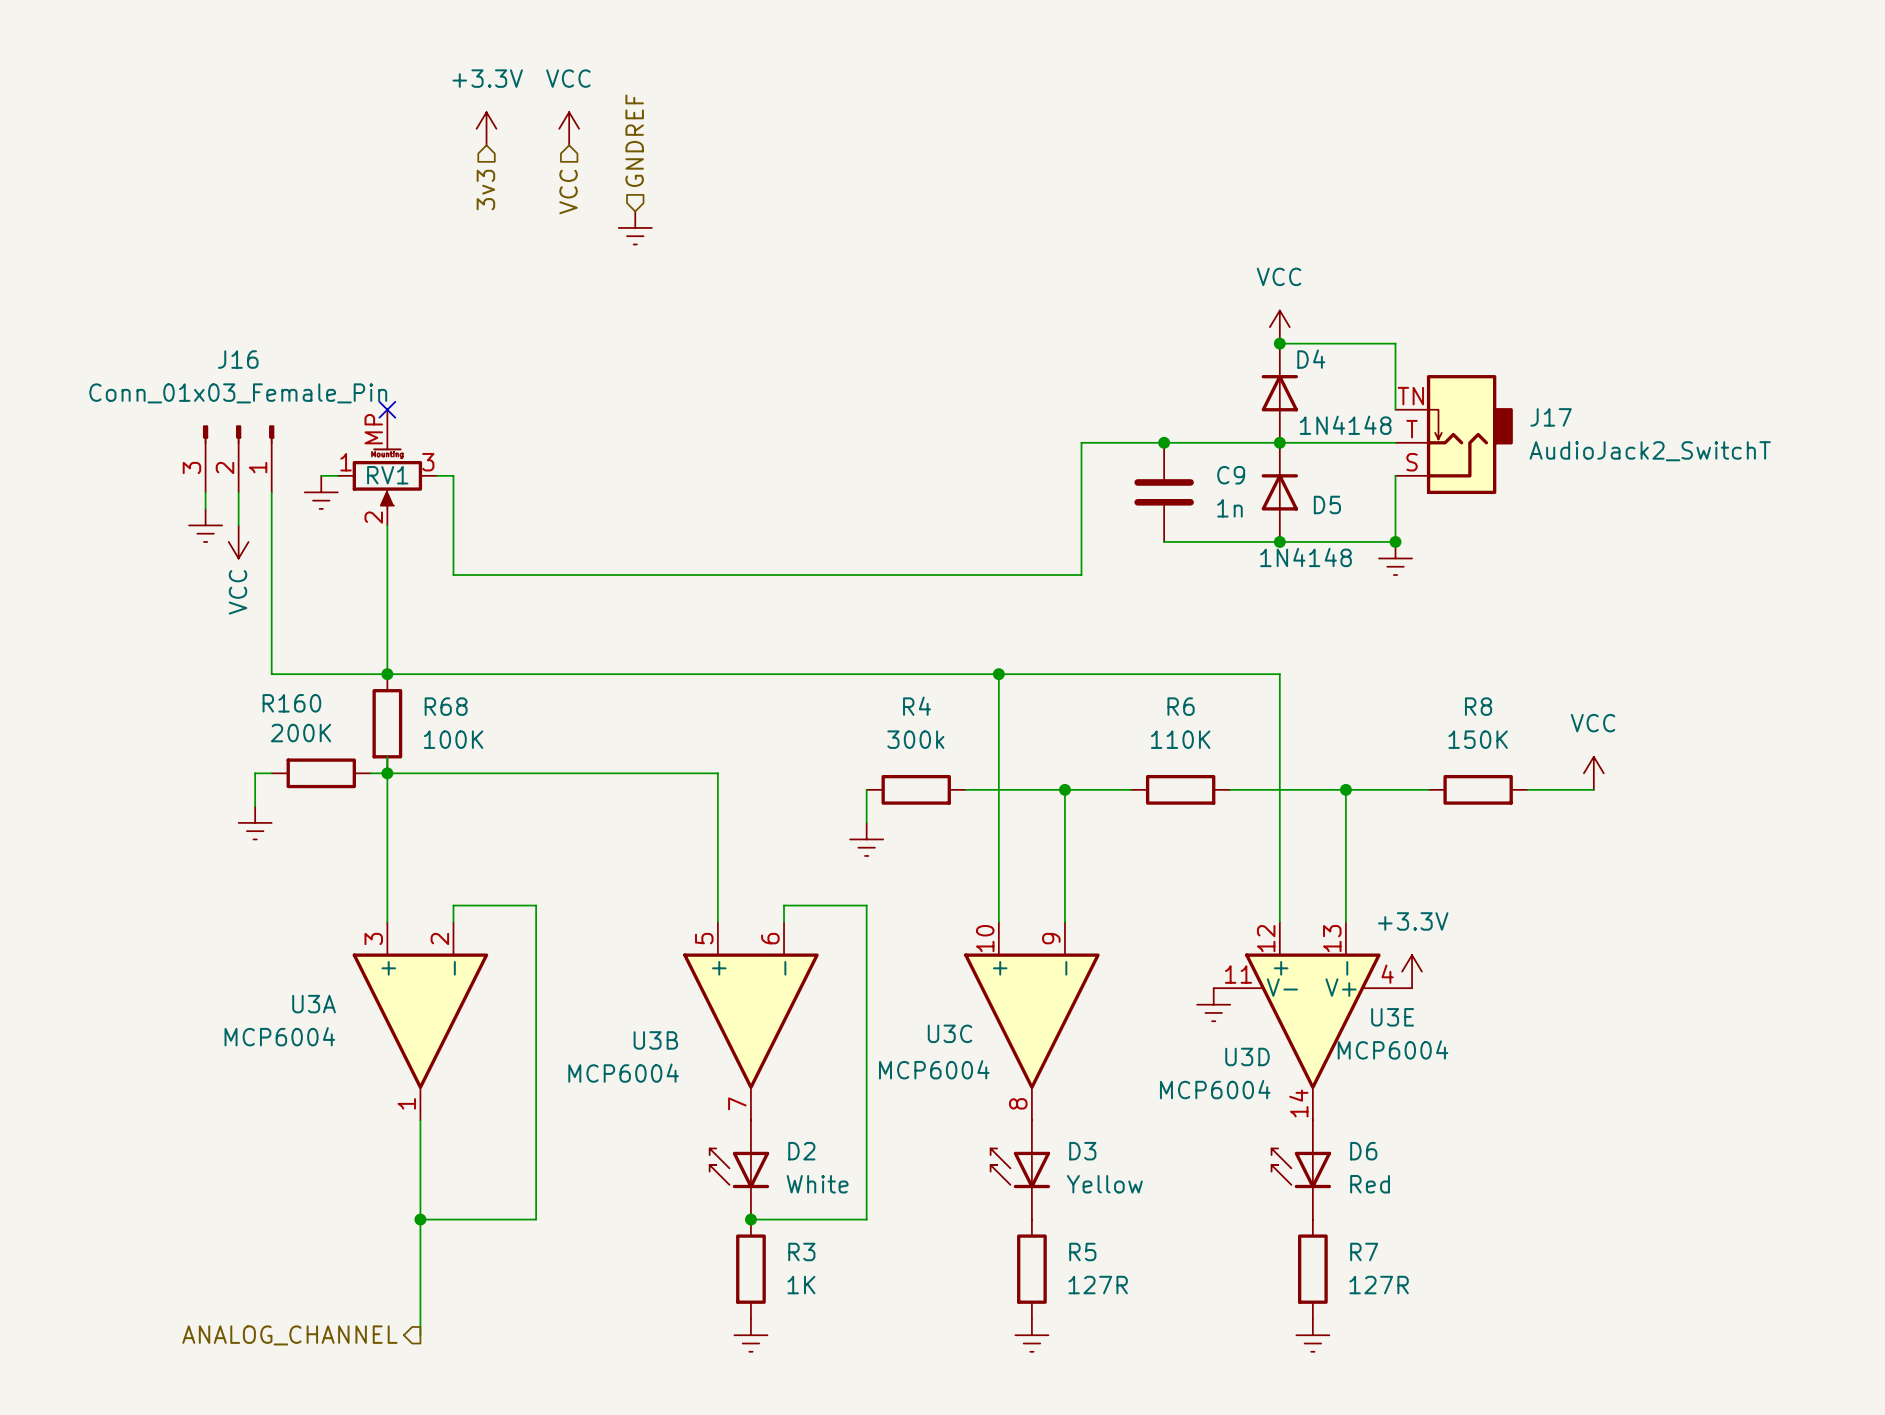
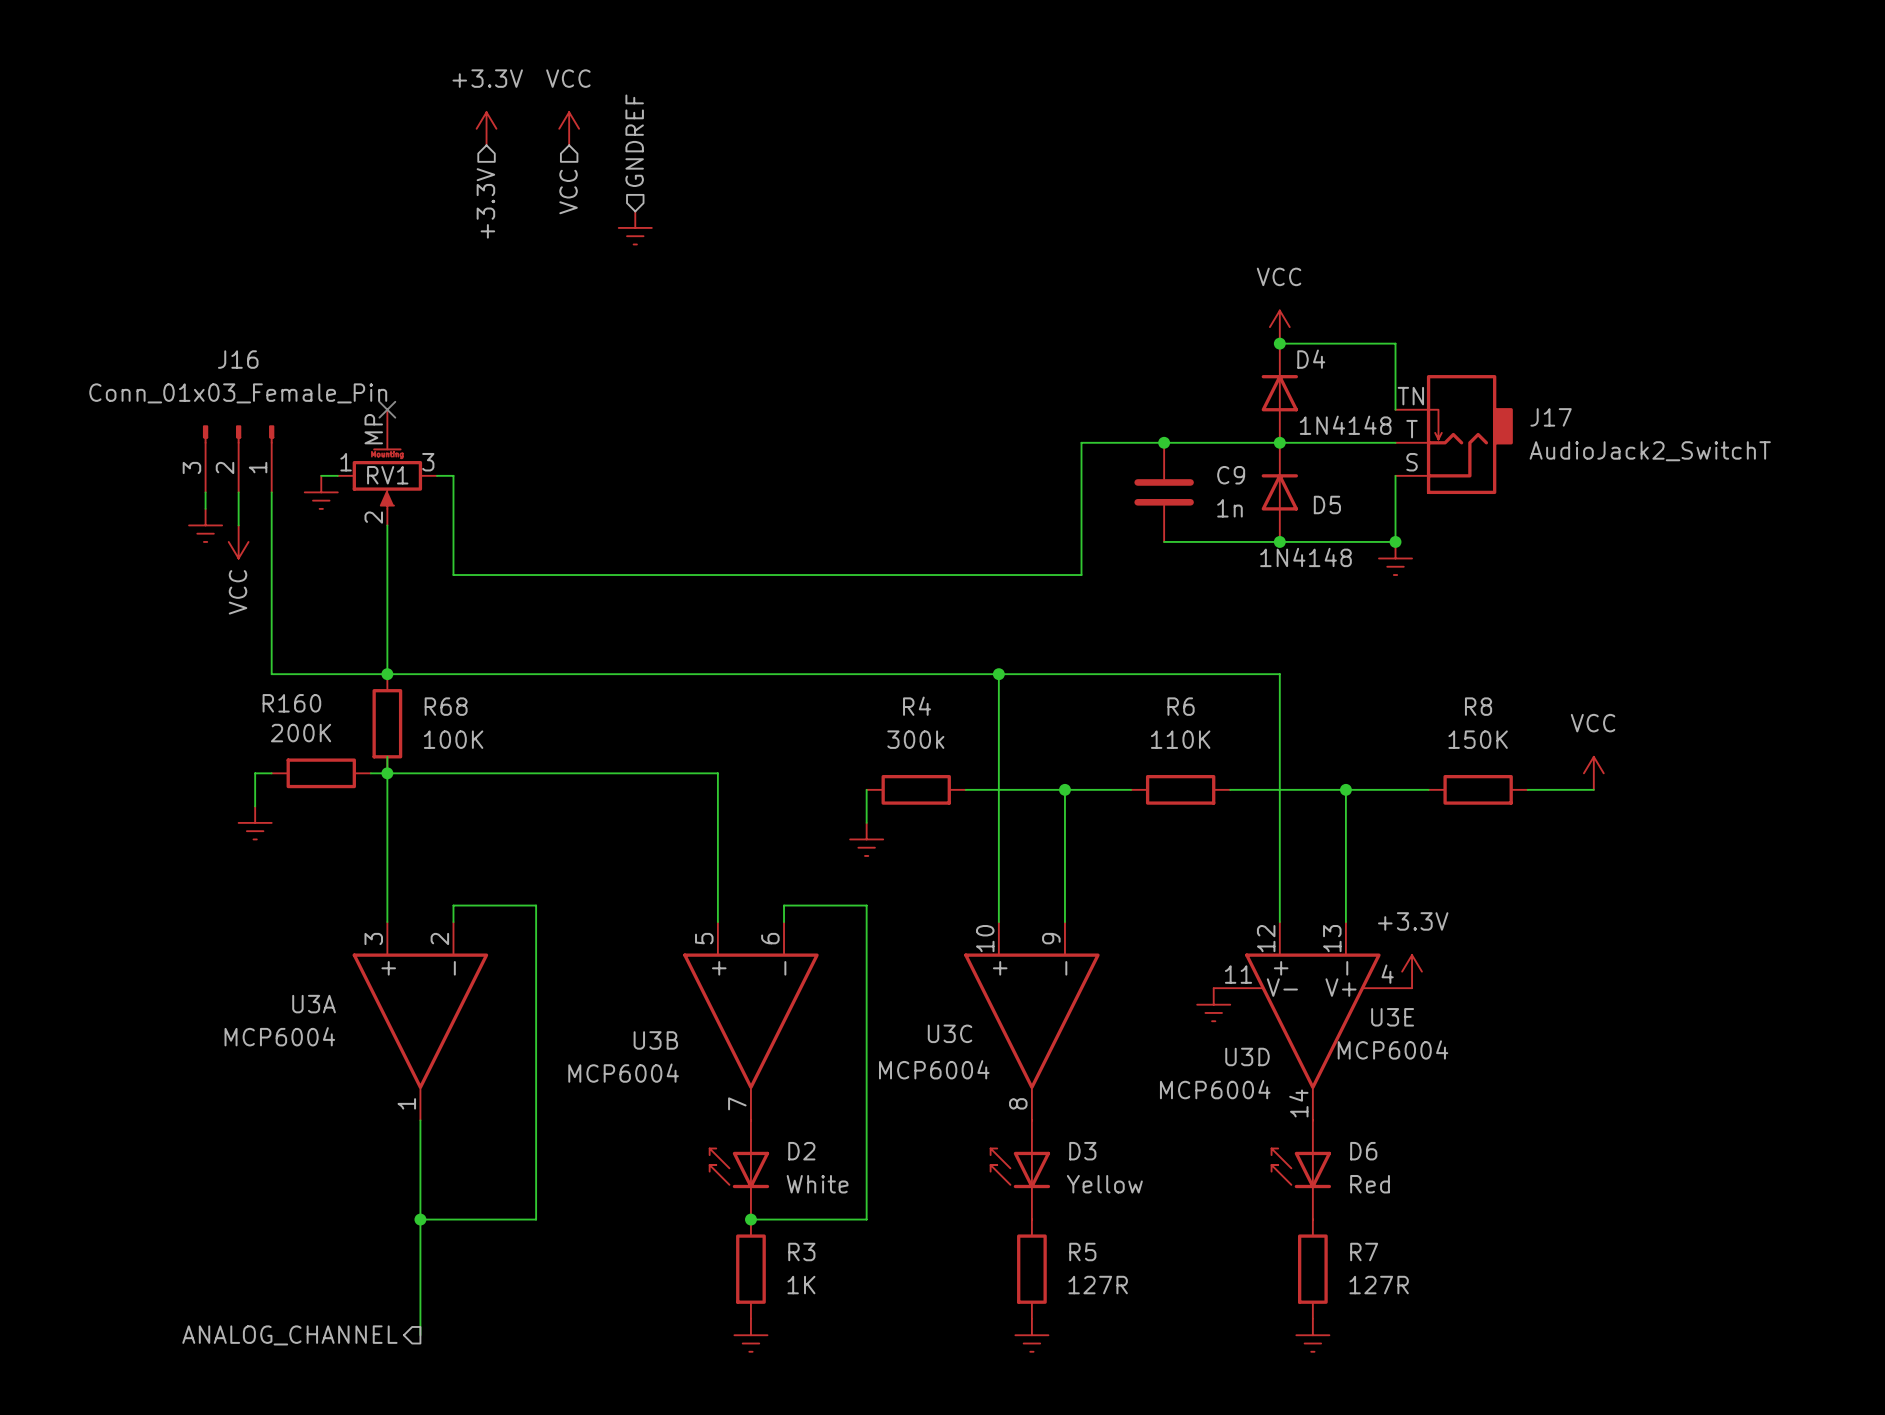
hierarchical label: 3v3 (485, 190) -> +3.3V (485, 203)

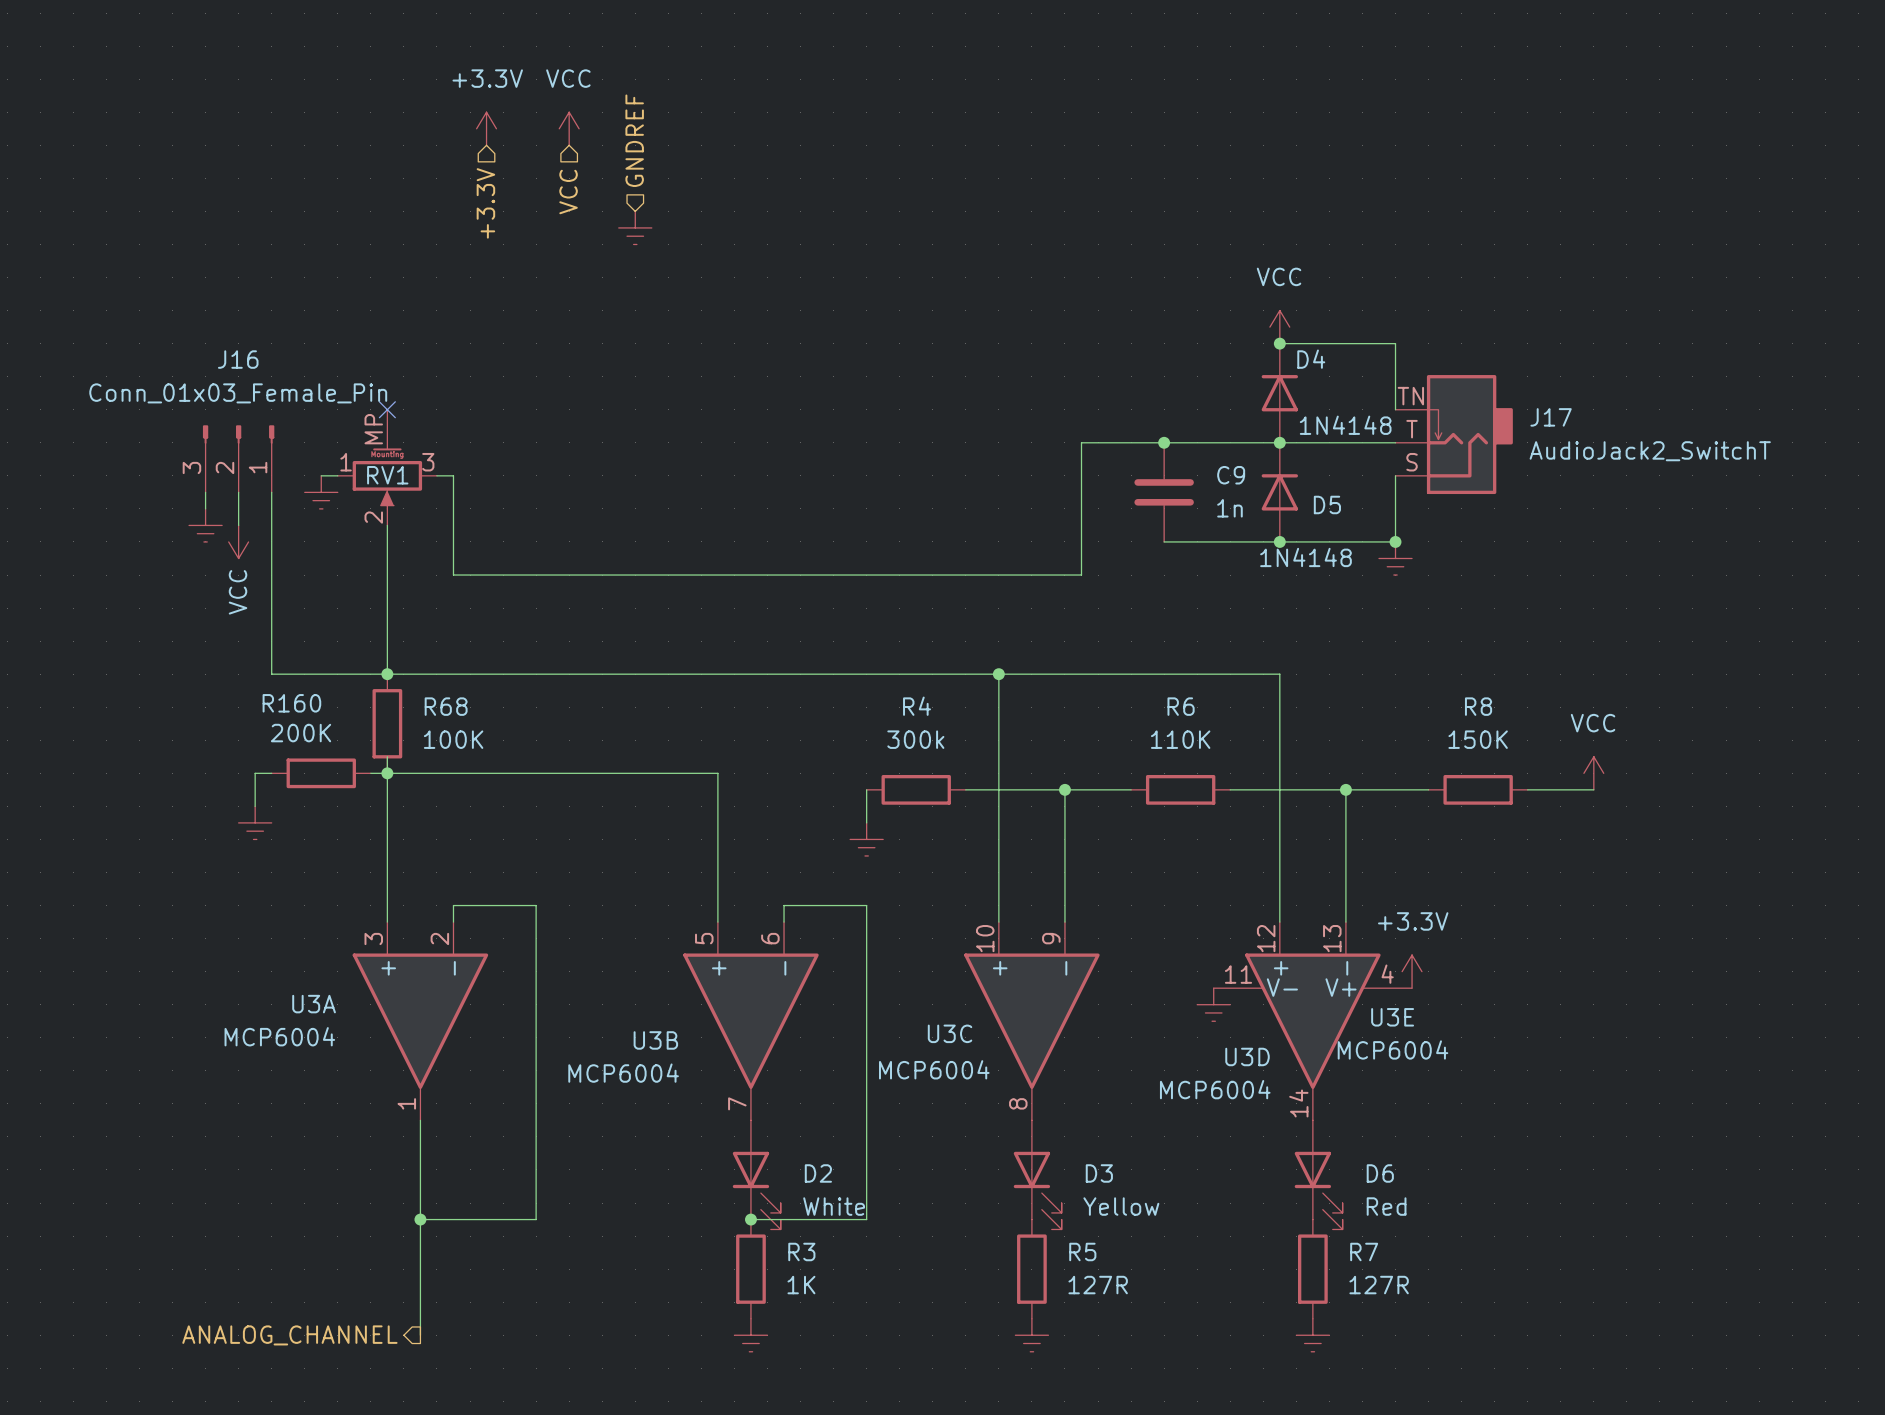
D2 symbol: [709, 1120, 770, 1220] -> [732, 1120, 781, 1230]
D3 symbol: [990, 1120, 1051, 1220] -> [1013, 1120, 1062, 1230]
D6 symbol: [1271, 1120, 1332, 1220] -> [1294, 1120, 1343, 1230]

